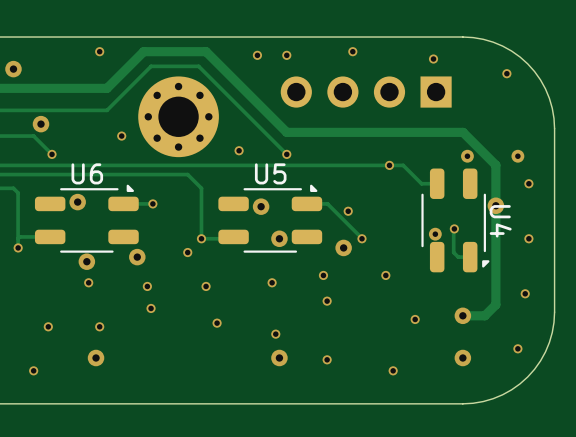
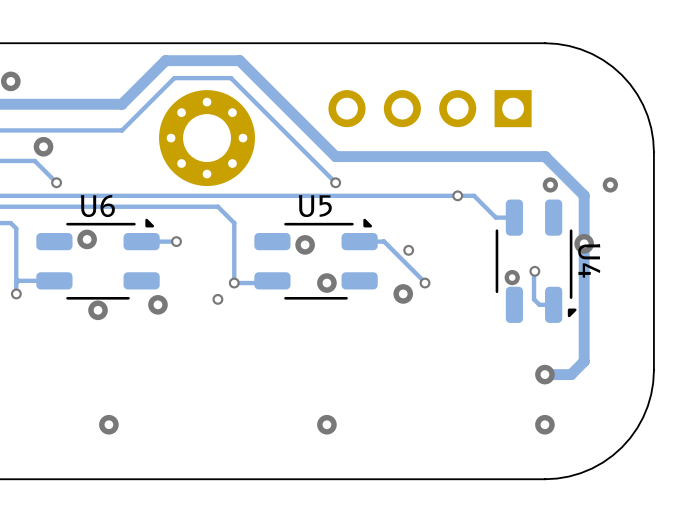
via: (99, 51) -> none
via: (352, 51) -> none
via: (257, 55) -> none
via: (286, 55) -> none
via: (433, 59) -> none
via: (506, 73) -> none
via: (121, 136) -> none
via: (239, 150) -> none
via: (528, 183) -> none
via: (528, 238) -> none
via: (323, 275) -> none
via: (385, 275) -> none
via: (88, 282) -> none
via: (272, 282) -> none
via: (147, 286) -> none
via: (206, 286) -> none
via: (525, 293) -> none
via: (327, 301) -> none
via: (151, 308) -> none
via: (415, 319) -> none
via: (217, 323) -> none
via: (48, 326) -> none
via: (99, 326) -> none
via: (275, 334) -> none
via: (517, 348) -> none
via: (327, 359) -> none
via: (33, 370) -> none
via: (393, 370) -> none

